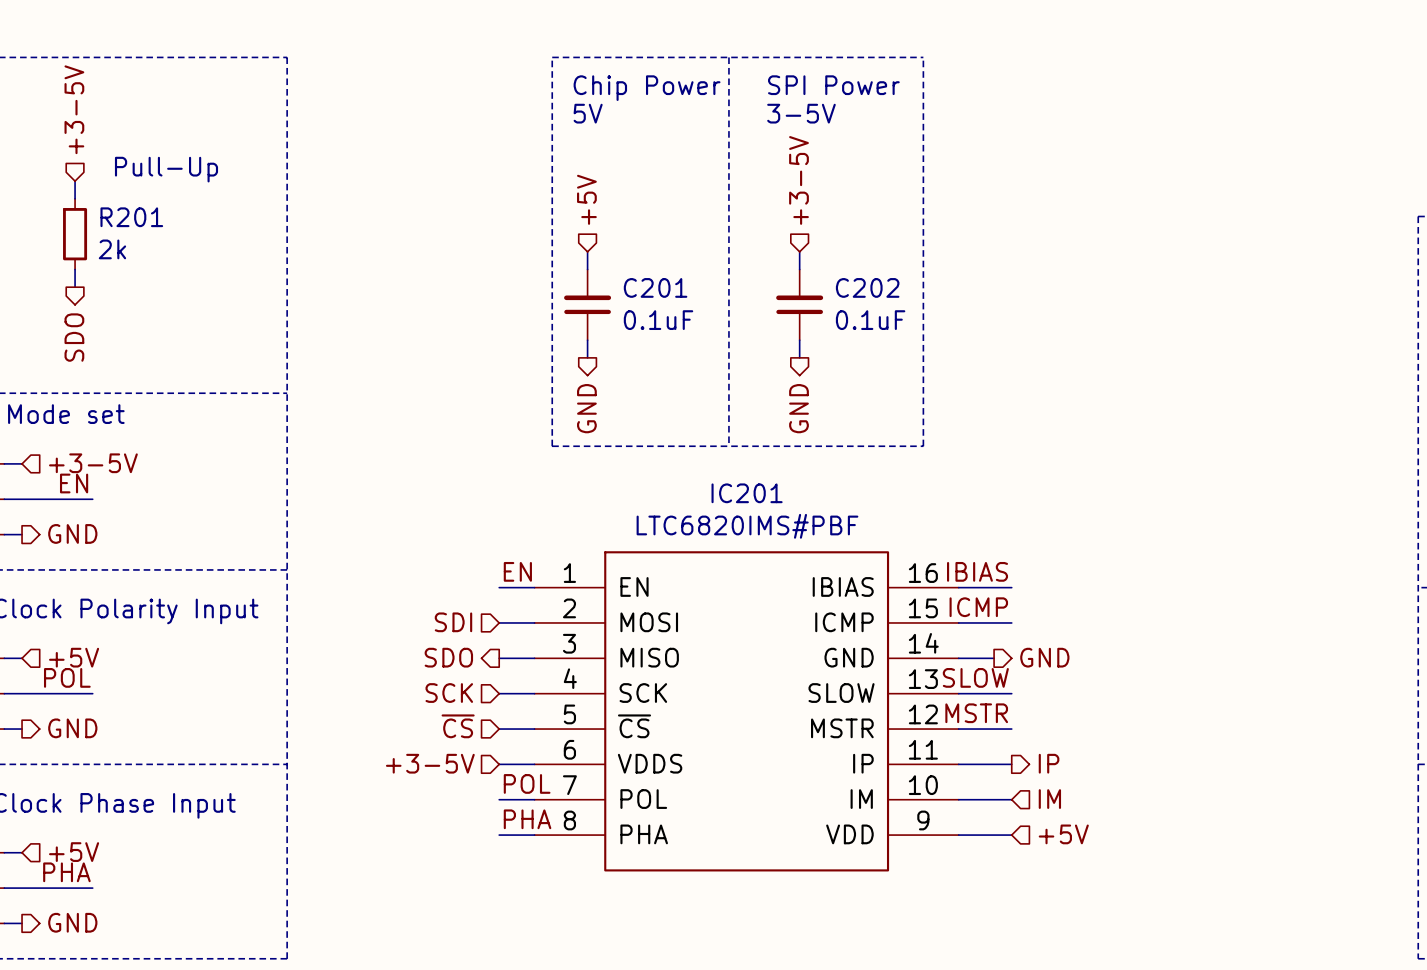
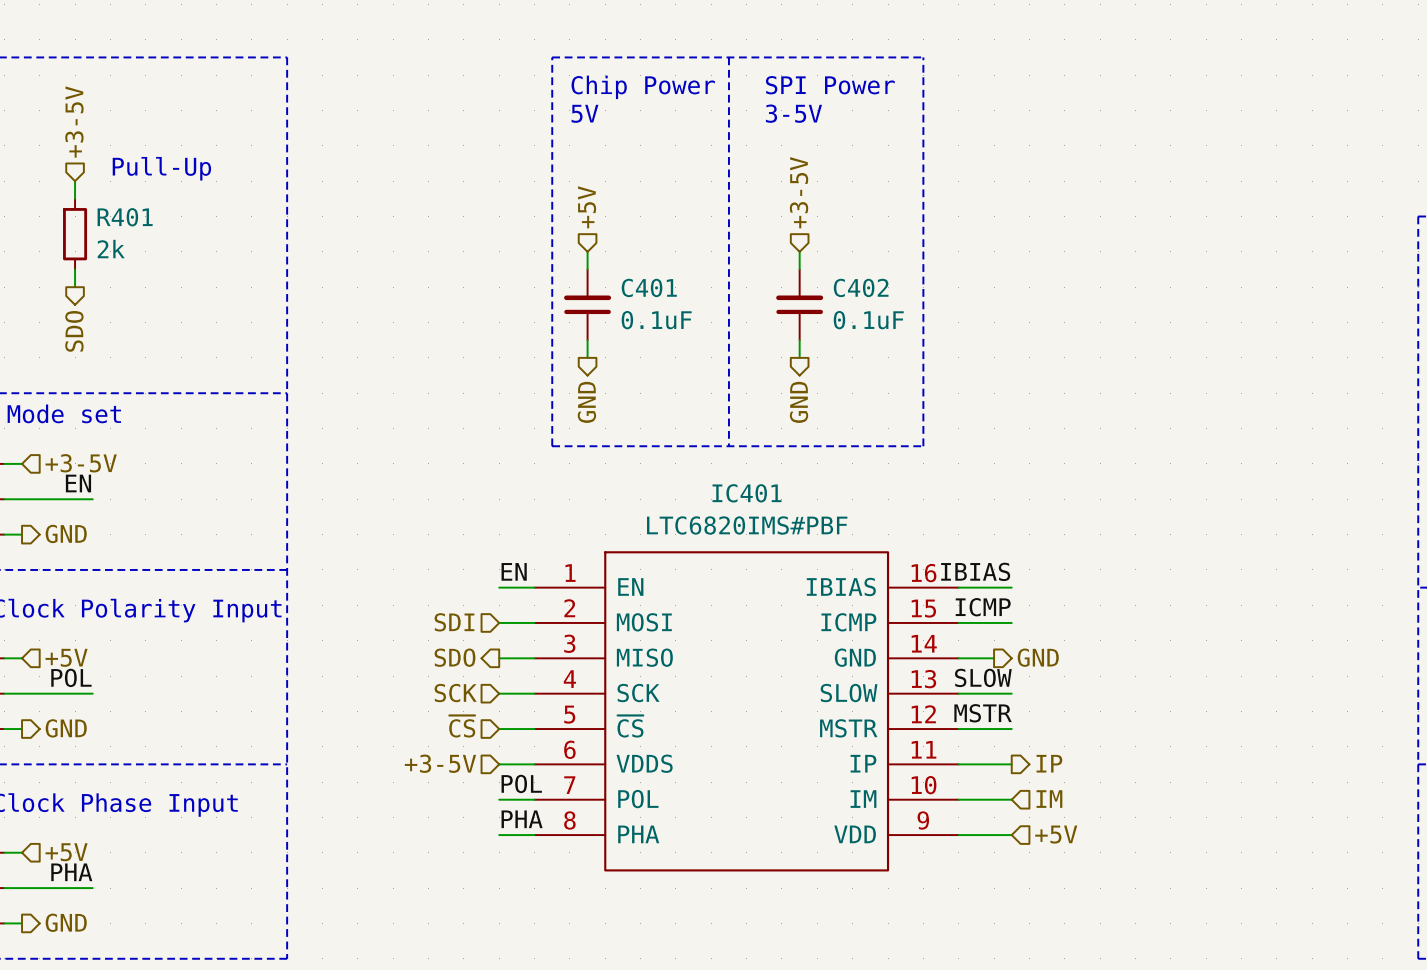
R201 name: R201 (131, 217) -> R401 (125, 217)
C201 name: C201 (655, 287) -> C401 (649, 287)
C202 name: C202 (867, 287) -> C402 (861, 287)
IC201 name: IC201 (747, 493) -> IC401 (747, 493)

